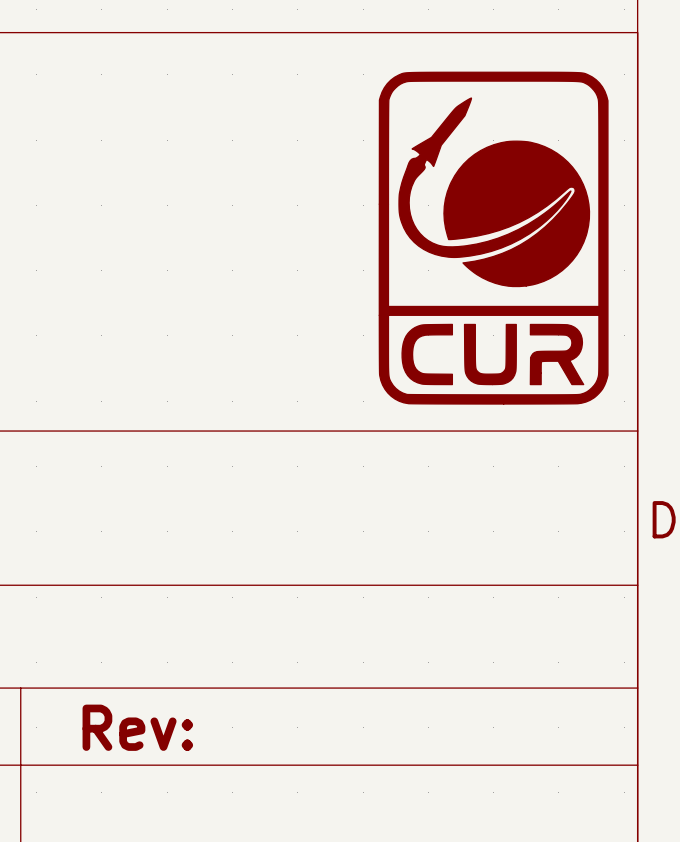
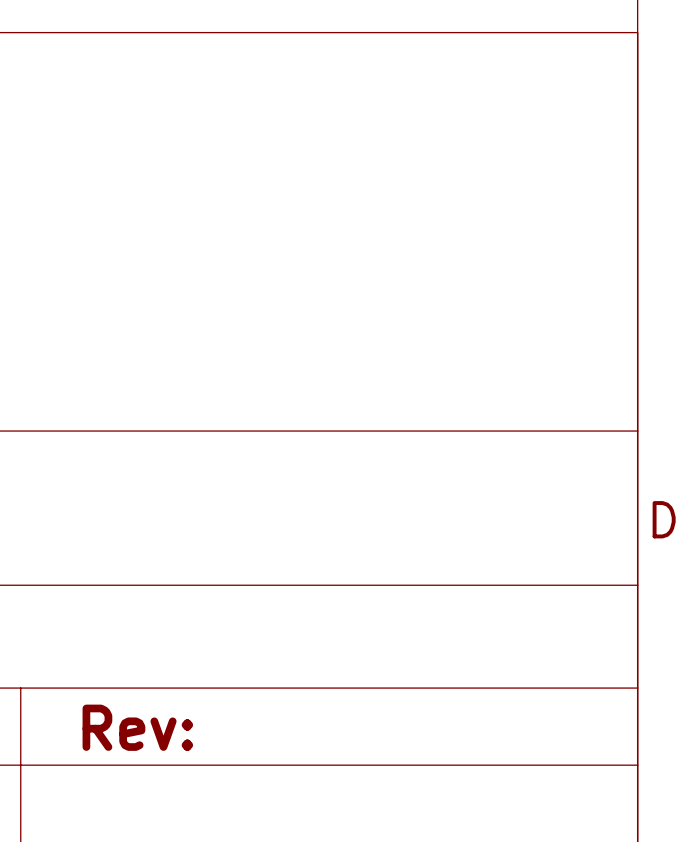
power symbol: (493, 238) -> none

